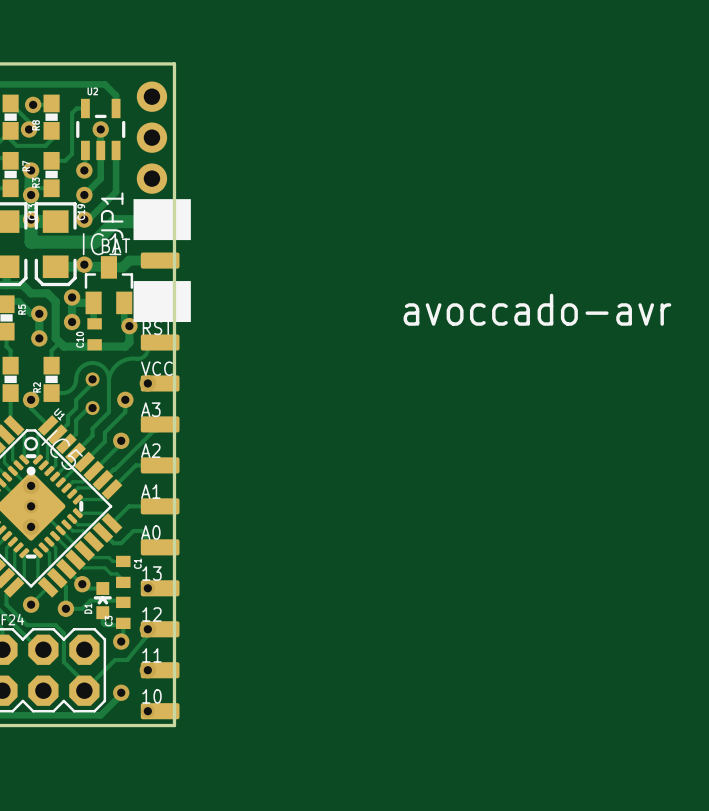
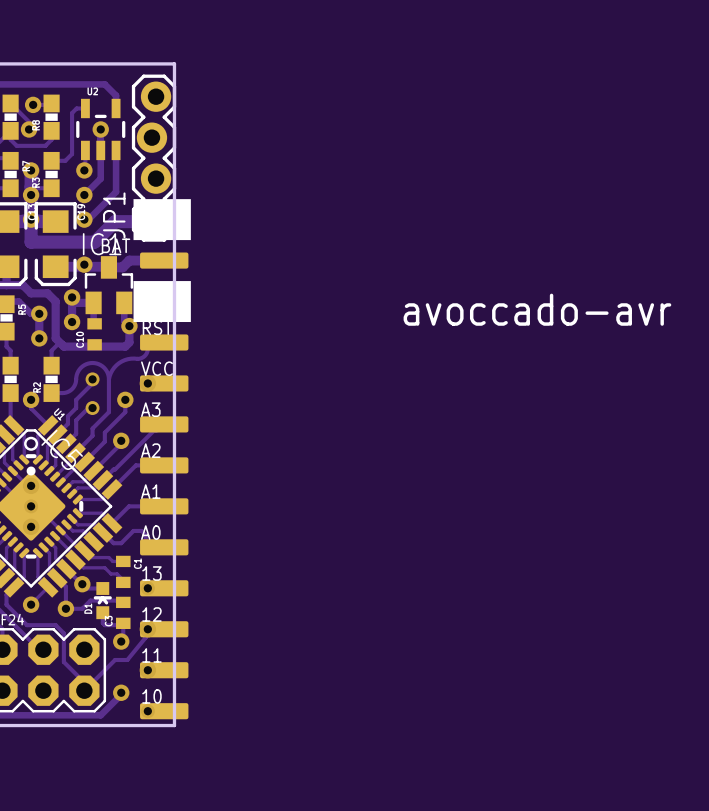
JP1 footprint: [136, 81, 168, 235] -> [131, 74, 177, 242]
part footprint: [140, 252, 180, 392] -> [140, 252, 189, 392]
part footprint: [140, 416, 180, 556] -> [140, 416, 189, 556]
part footprint: [140, 580, 180, 720] -> [140, 580, 189, 720]

